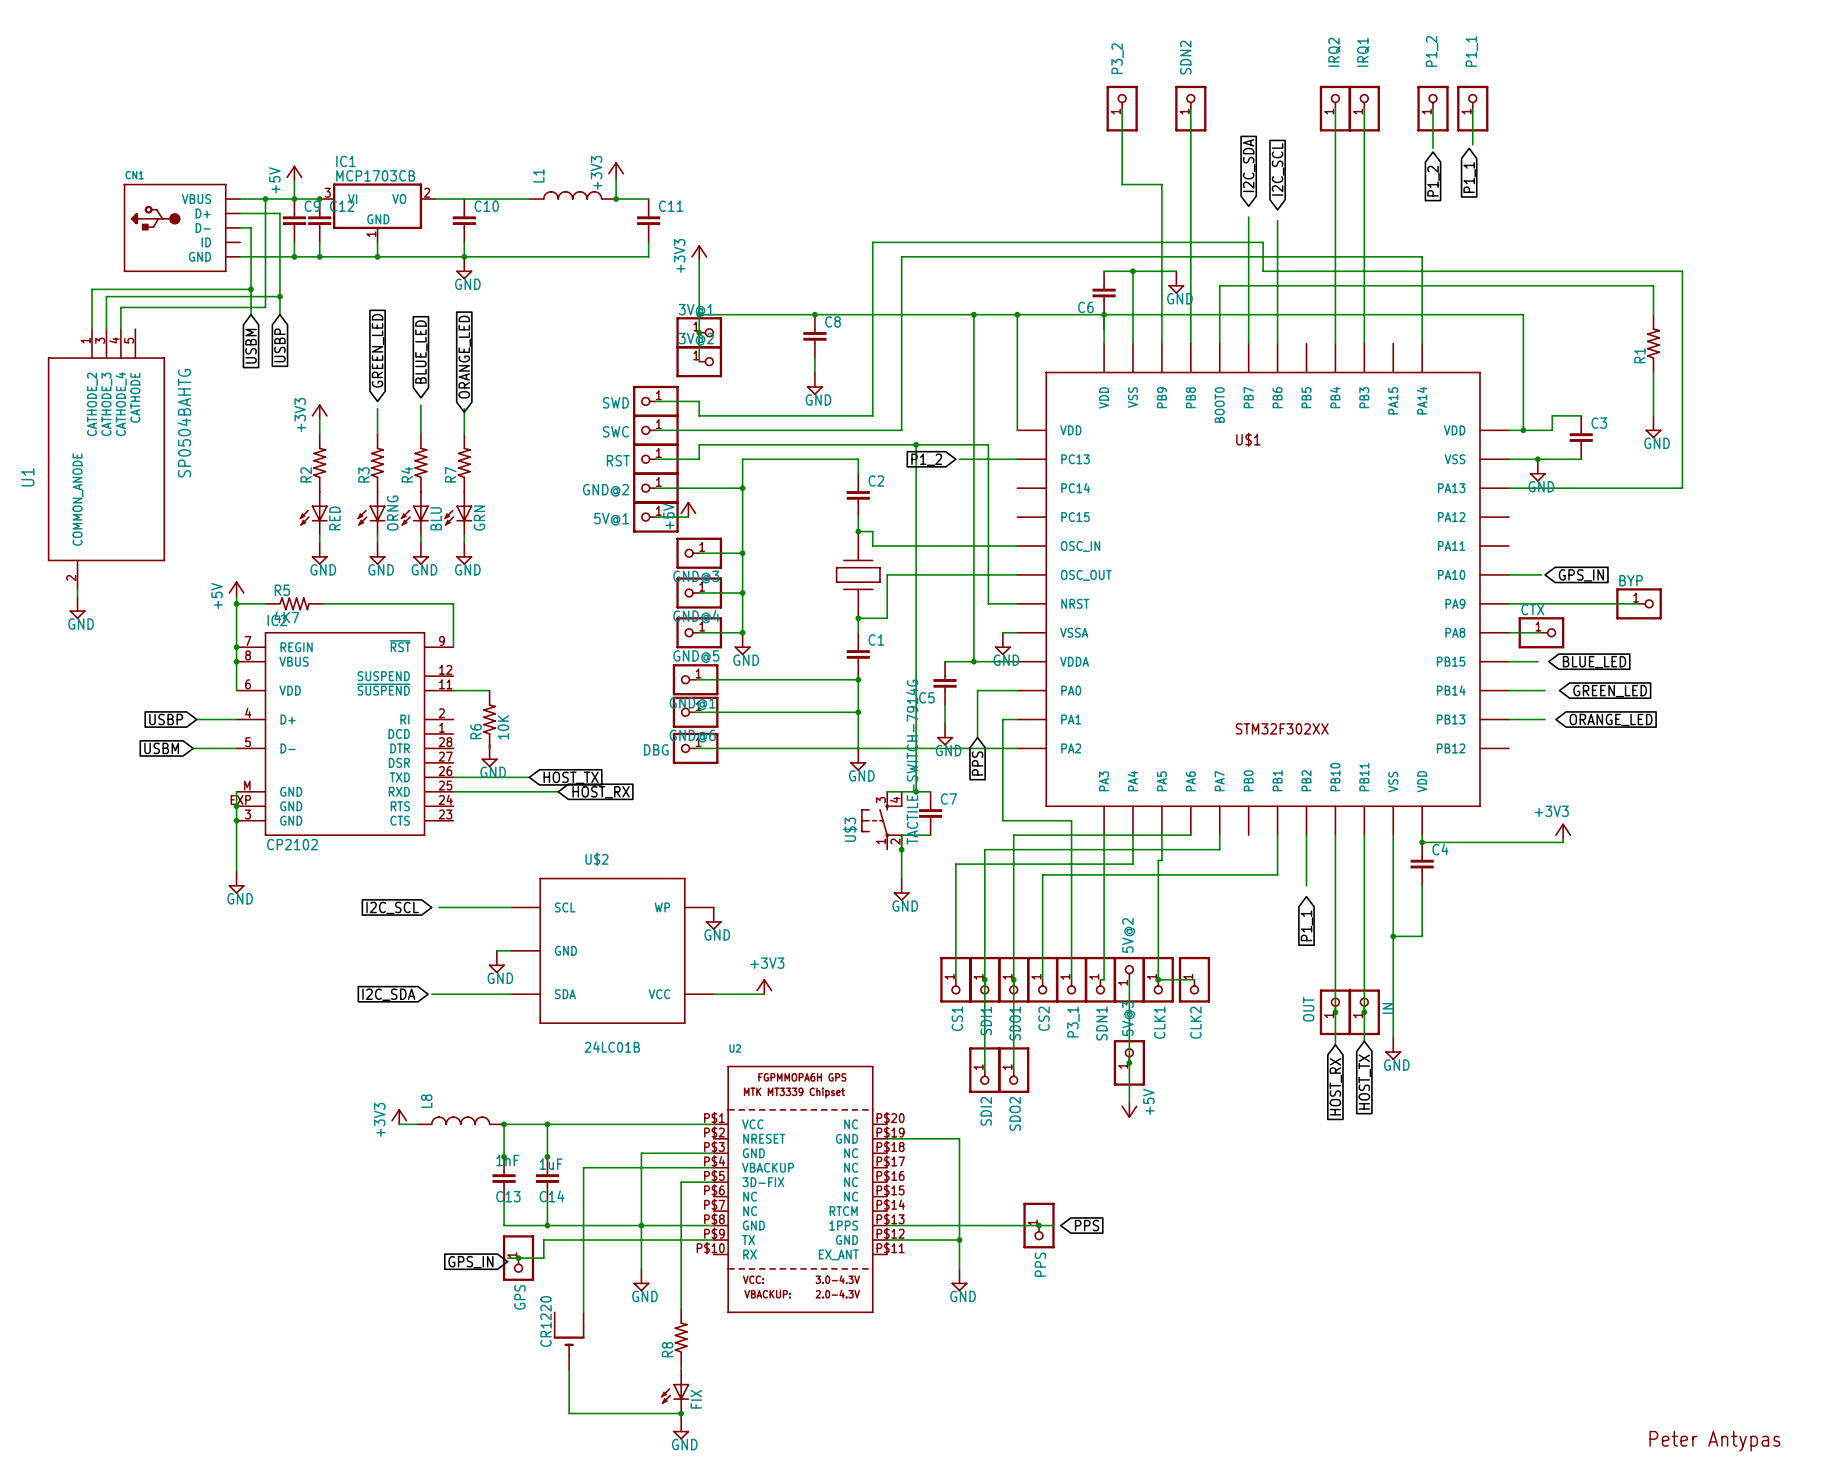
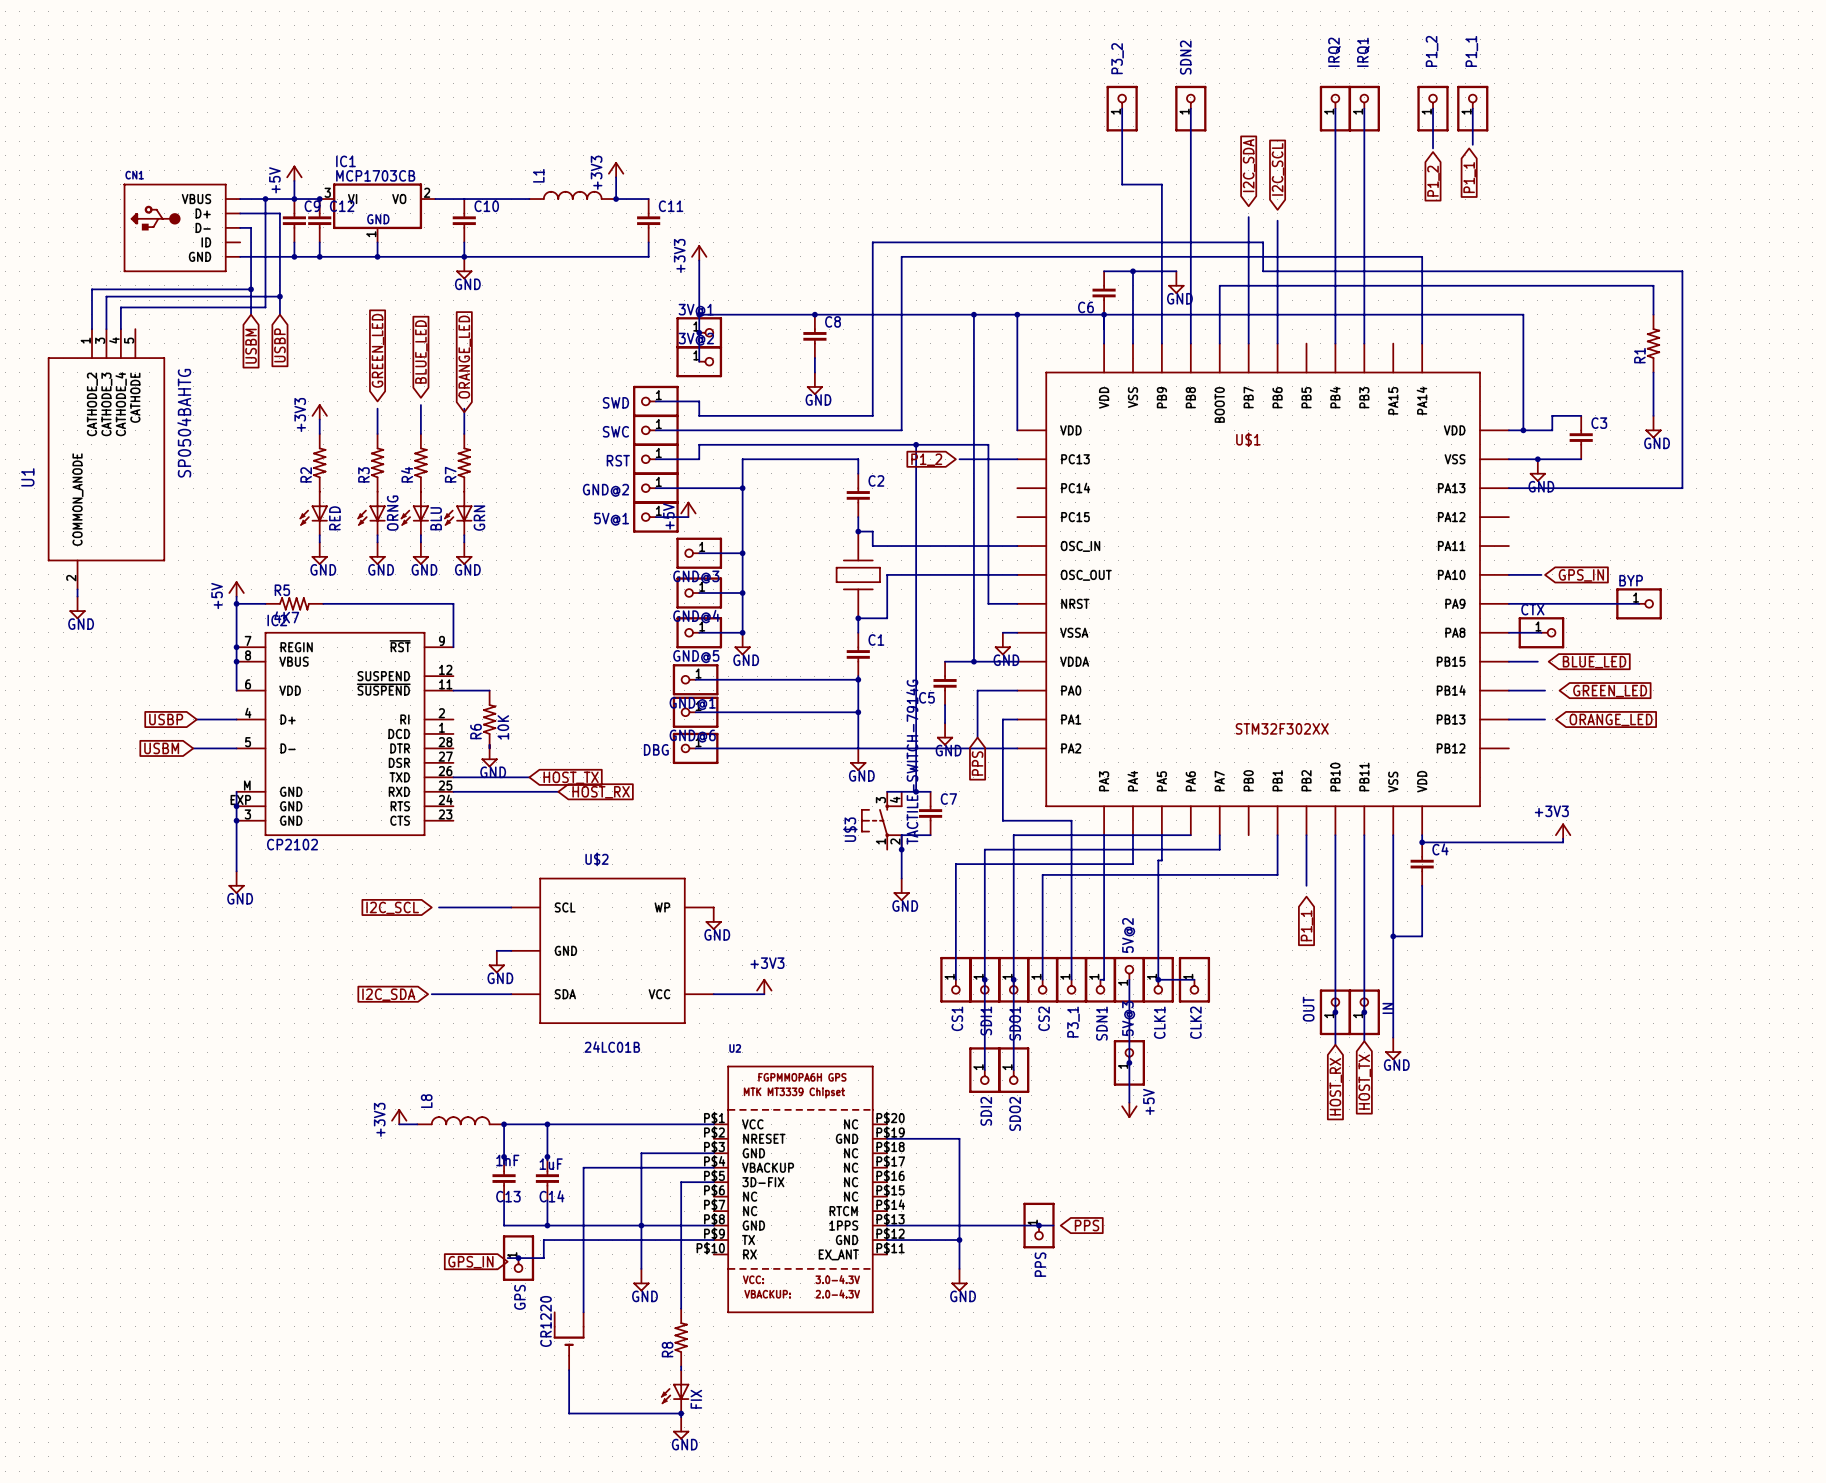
text: Peter Antypas (1714, 1441) -> none

